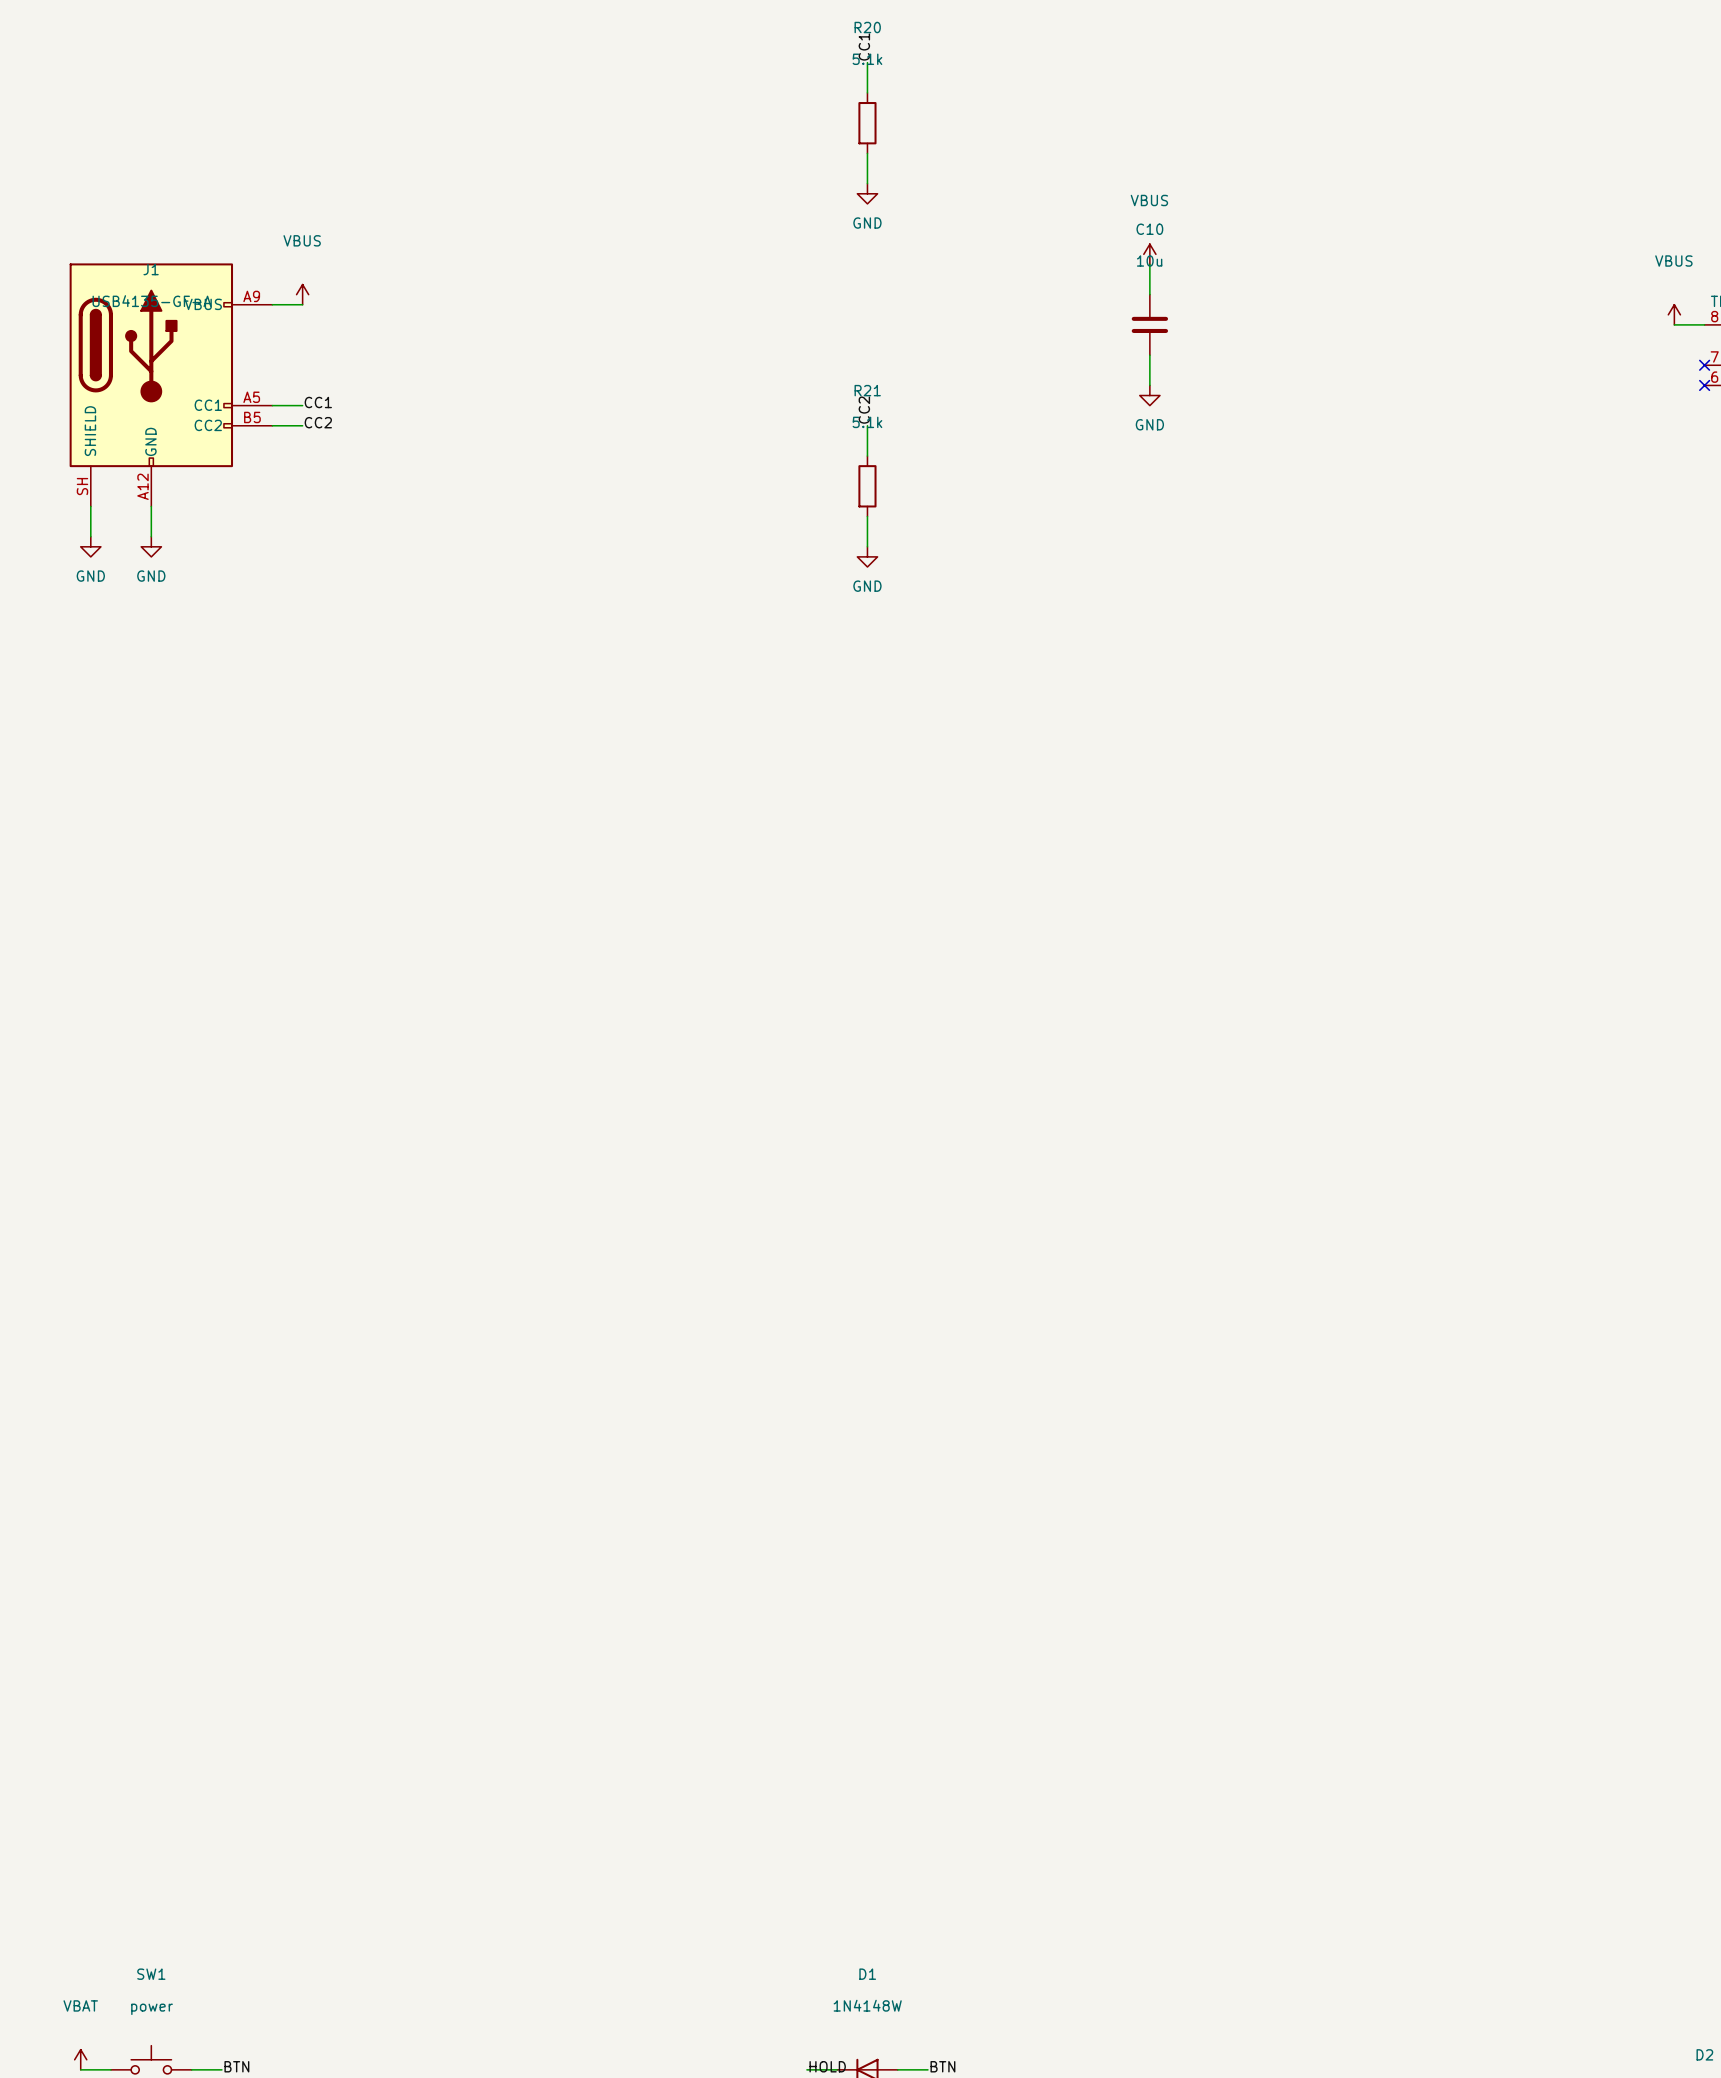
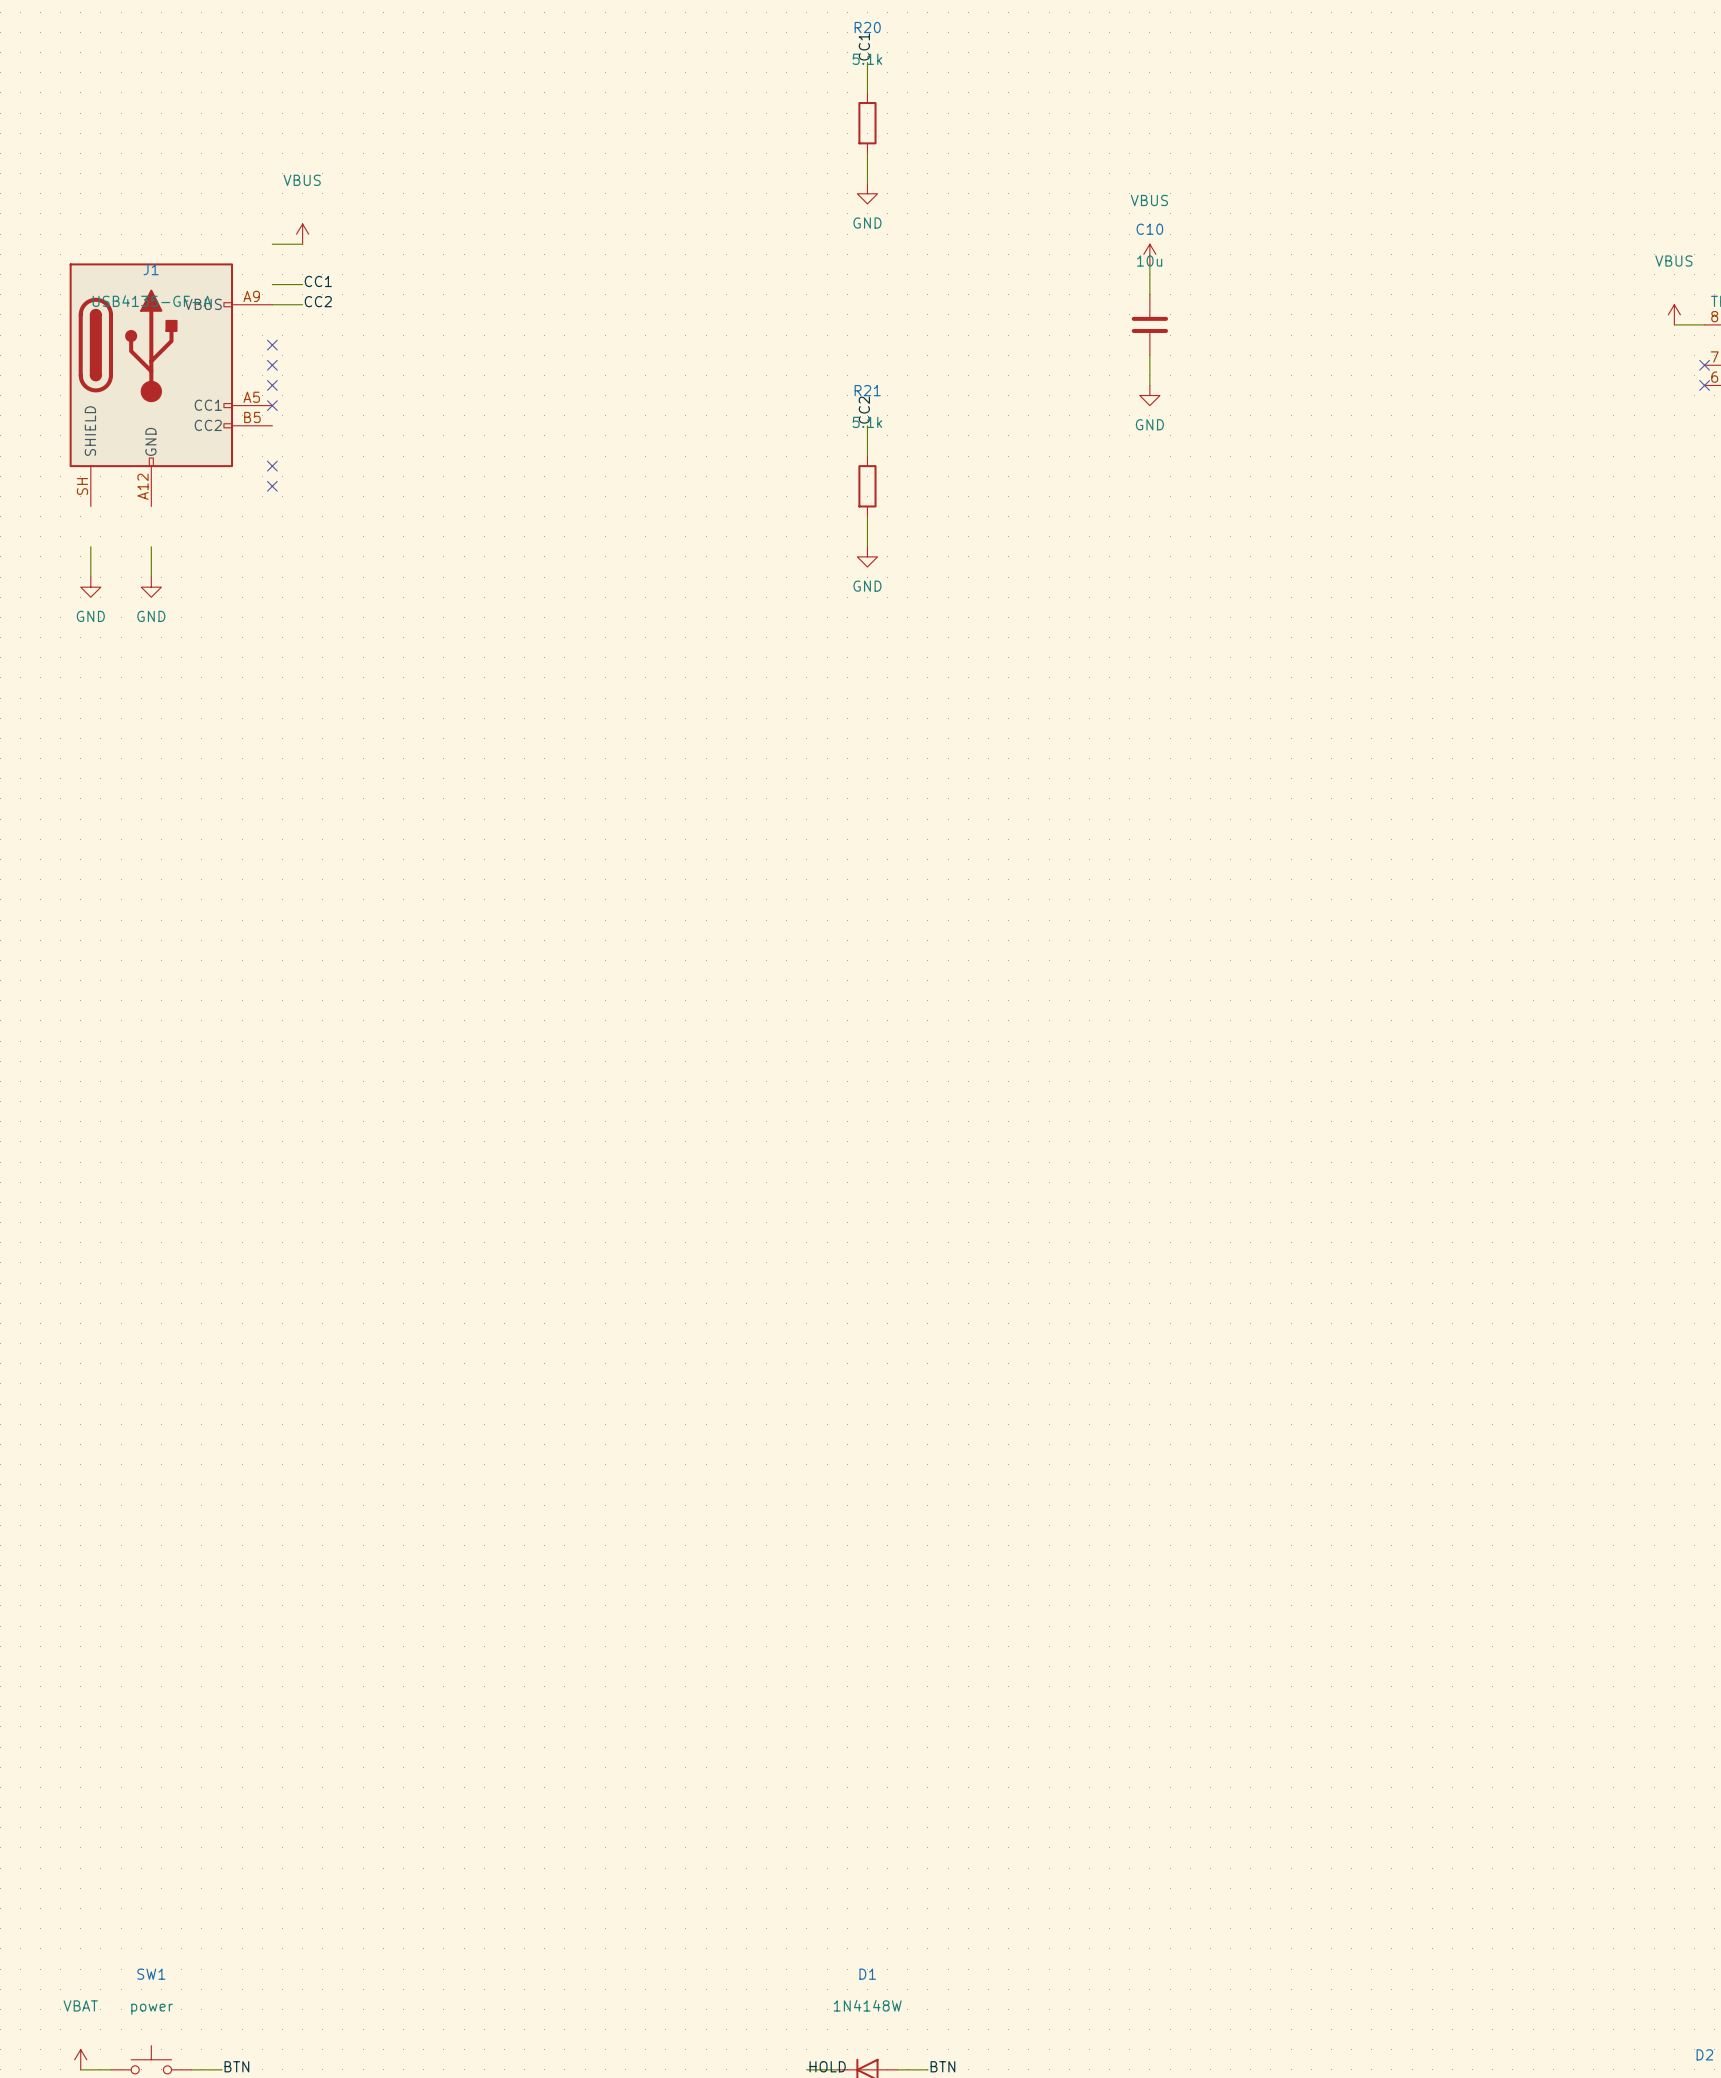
power symbol position: VBUS (302, 294) -> VBUS (302, 234)
no-connect mark: none -> (272, 345)
no-connect mark: none -> (272, 365)
no-connect mark: none -> (272, 385)
label position: CC1 (318, 402) -> CC1 (318, 281)
wire: (272, 405) (302, 405) -> (272, 284) (302, 284)
no-connect mark: none -> (272, 405)
label position: CC2 (318, 422) -> CC2 (318, 301)
wire: (272, 425) (302, 425) -> (272, 244) (302, 244)
no-connect mark: none -> (272, 466)
no-connect mark: none -> (272, 486)
wire: (90, 506) (90, 536) -> (90, 546) (90, 577)
wire: (151, 506) (151, 536) -> (151, 546) (151, 577)
power symbol: GND (90, 546) -> none
power symbol: GND (151, 546) -> none
power symbol: none -> GND (90, 587)
power symbol: none -> GND (151, 587)

